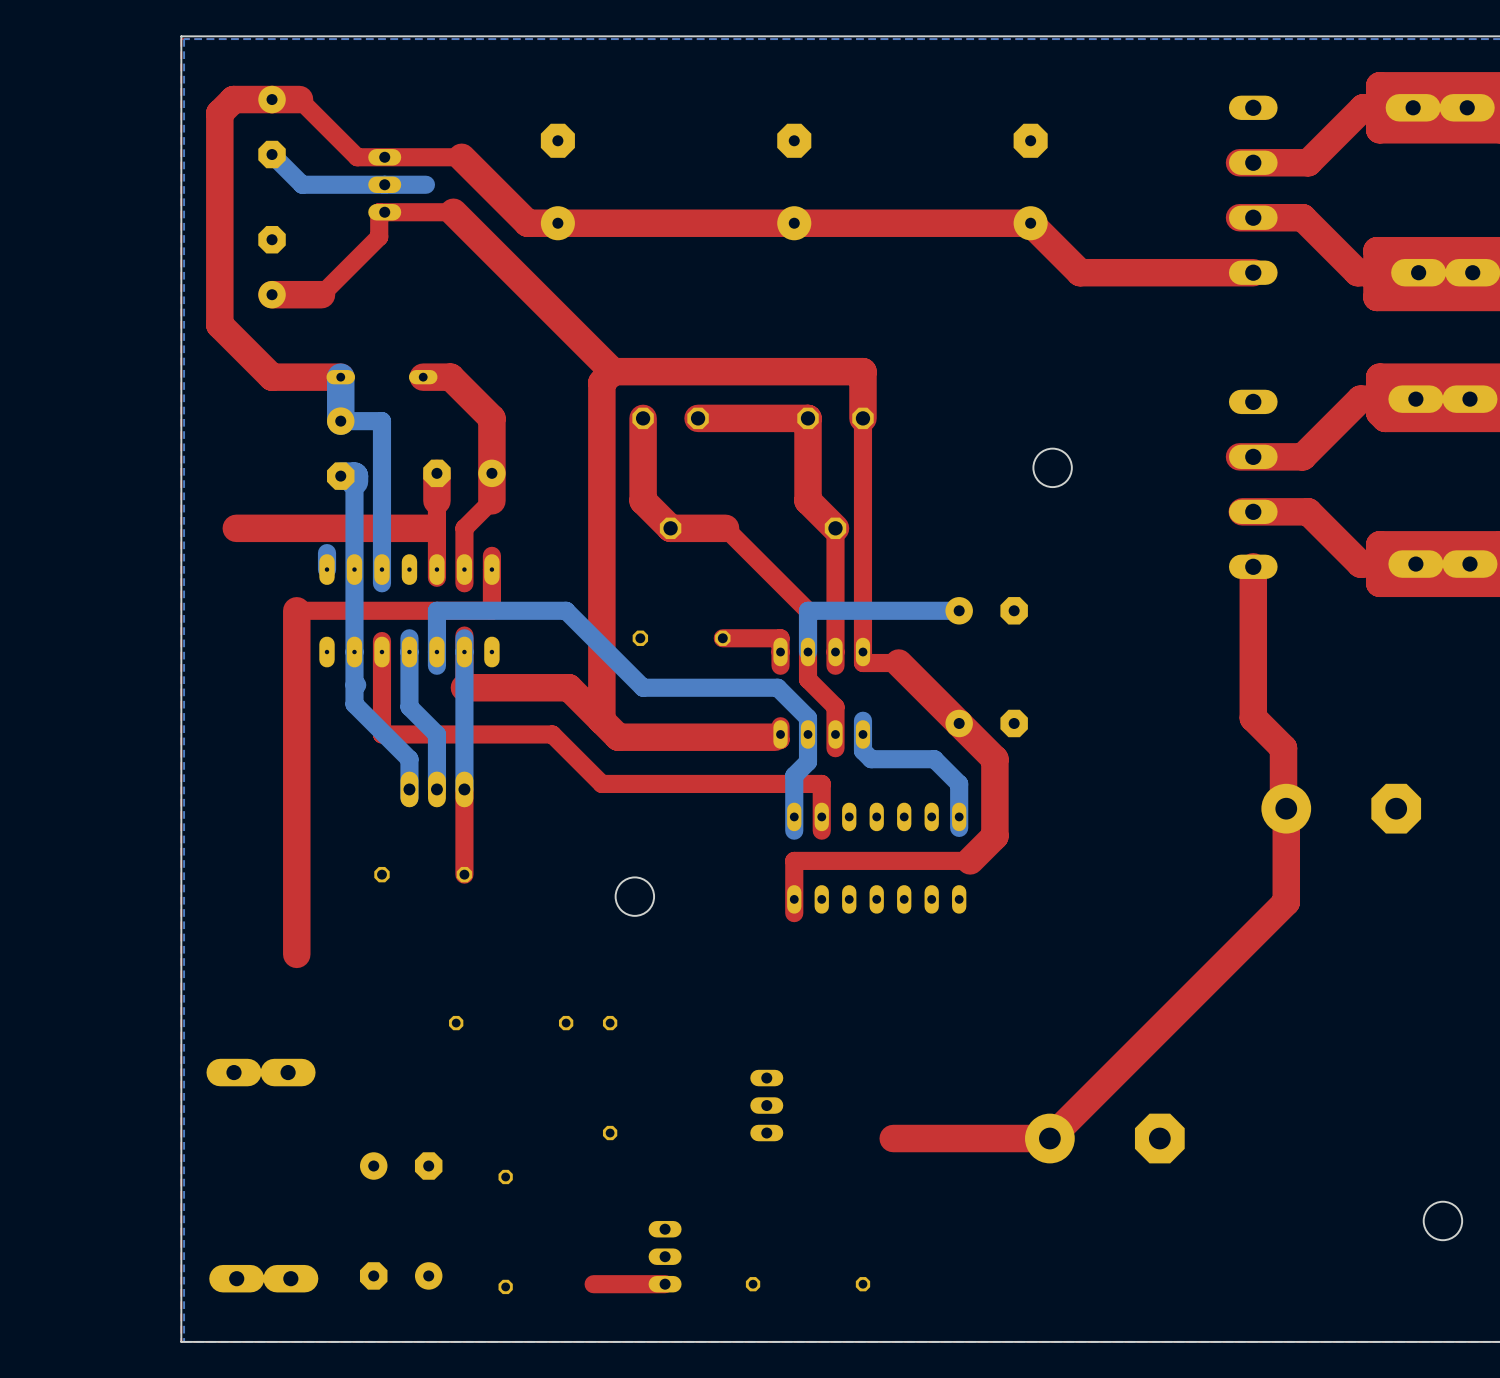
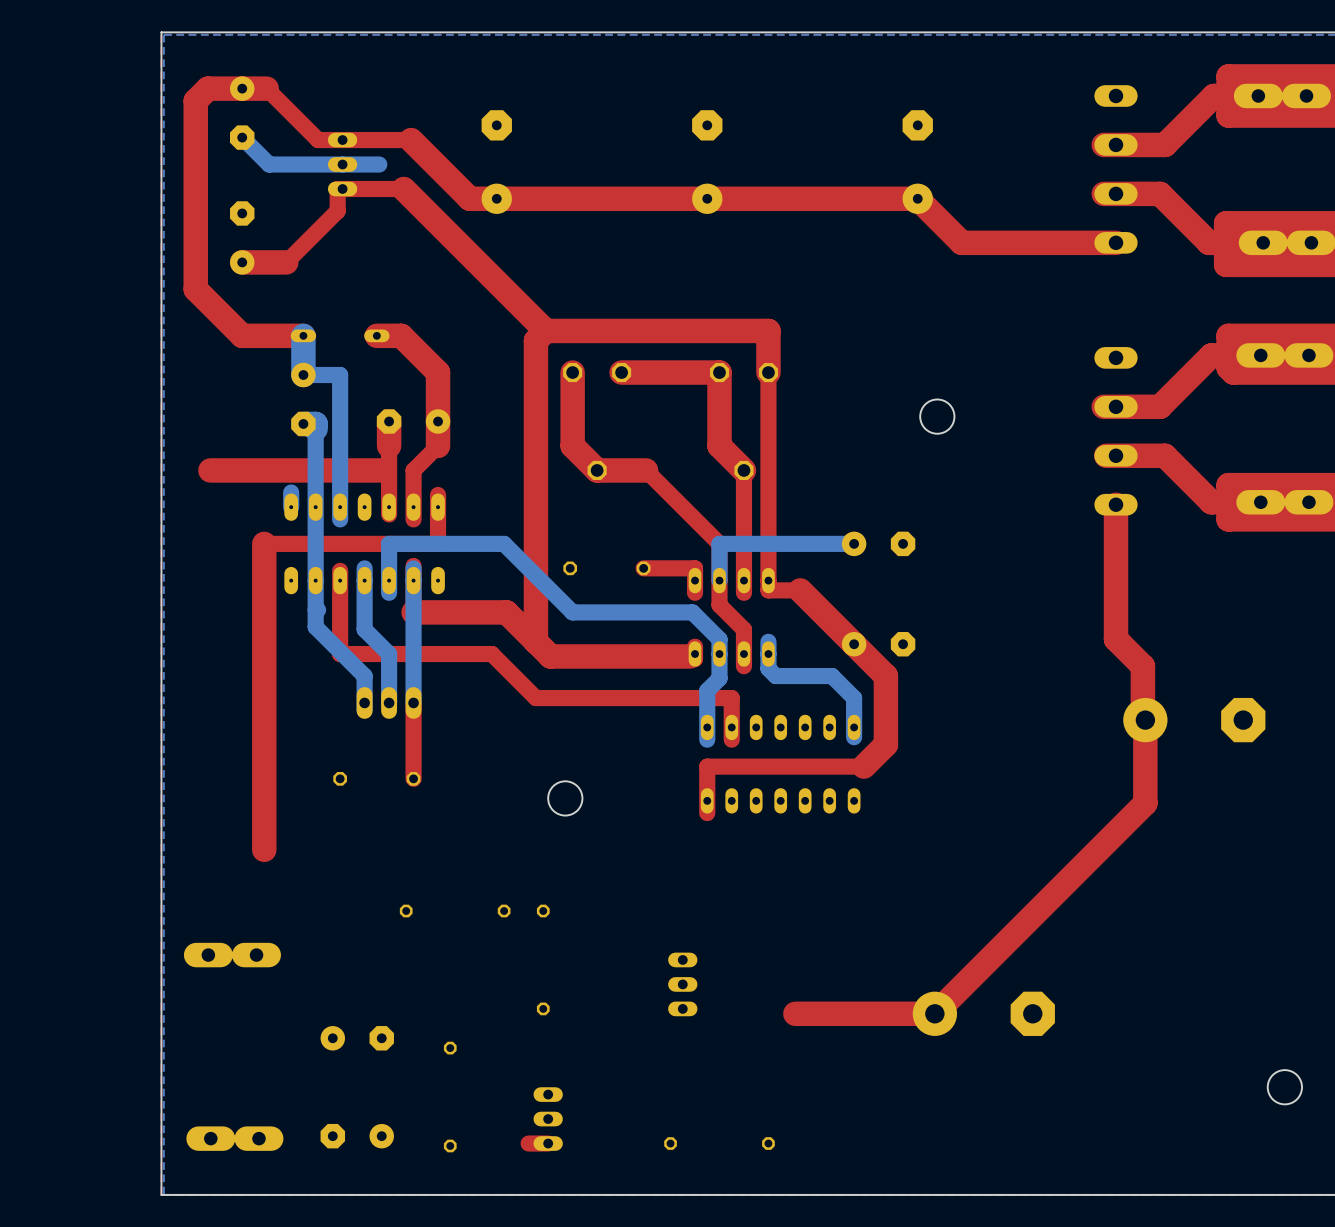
part position: (665, 1256) -> (548, 1119)
top track: (665, 1284) (615, 1284) -> none

